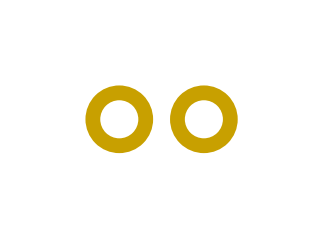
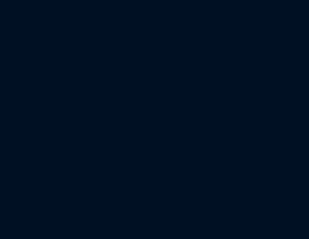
part: (161, 119) -> none

